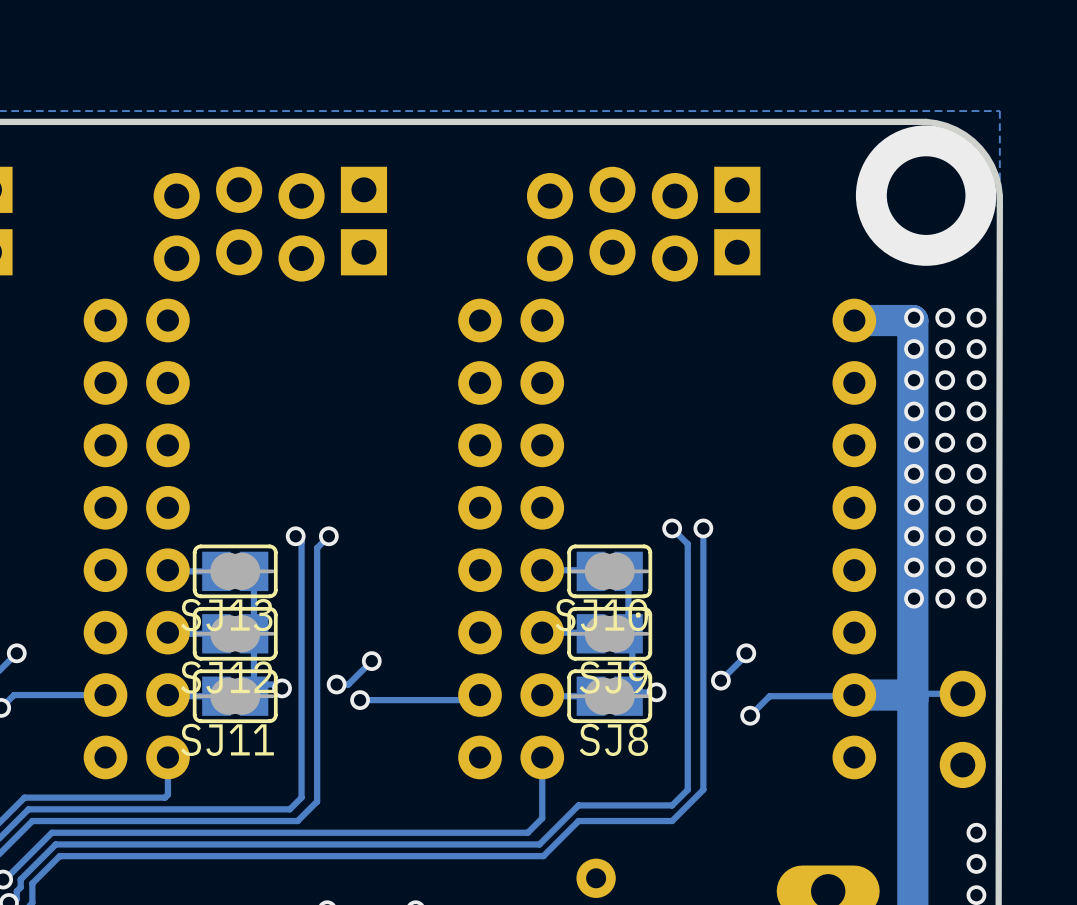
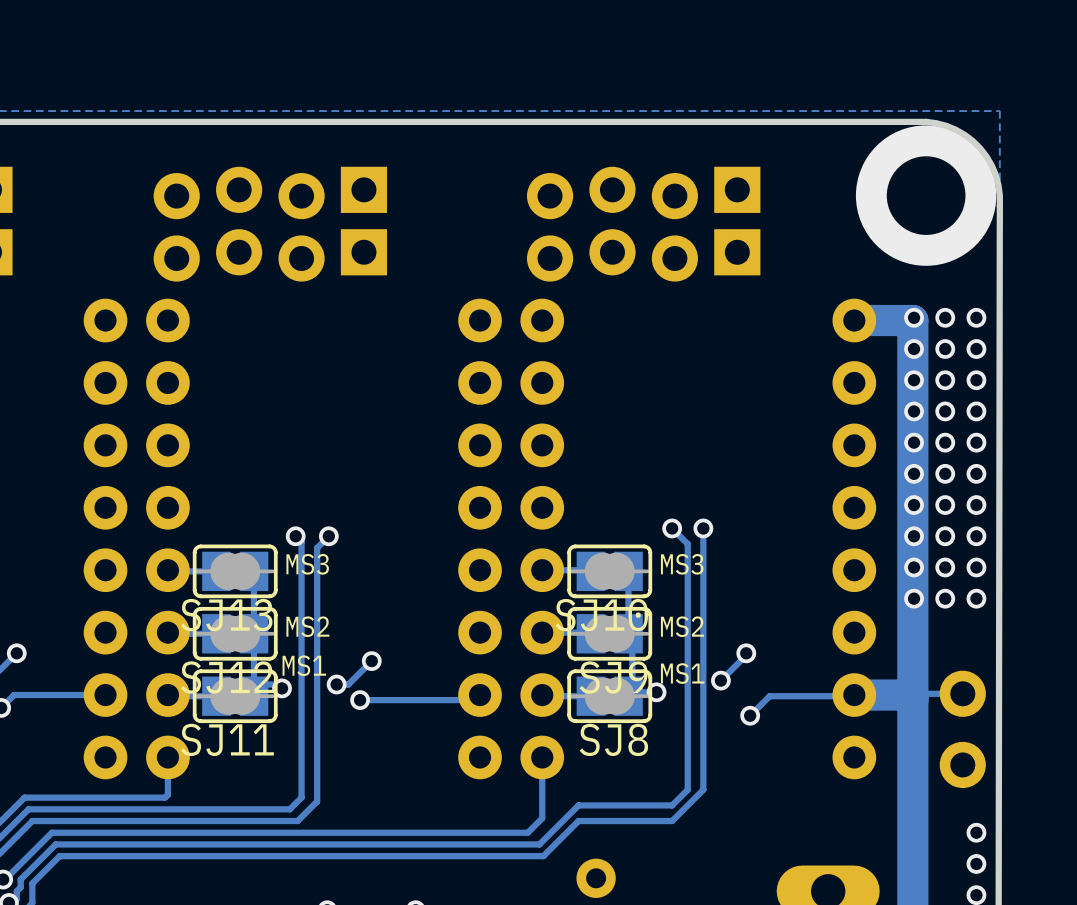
text: none -> MS3 (307, 564)
text: none -> MS3 (682, 564)
text: none -> MS2 (307, 626)
text: none -> MS2 (682, 626)
text: none -> MS1 (304, 665)
text: none -> MS1 (682, 673)

